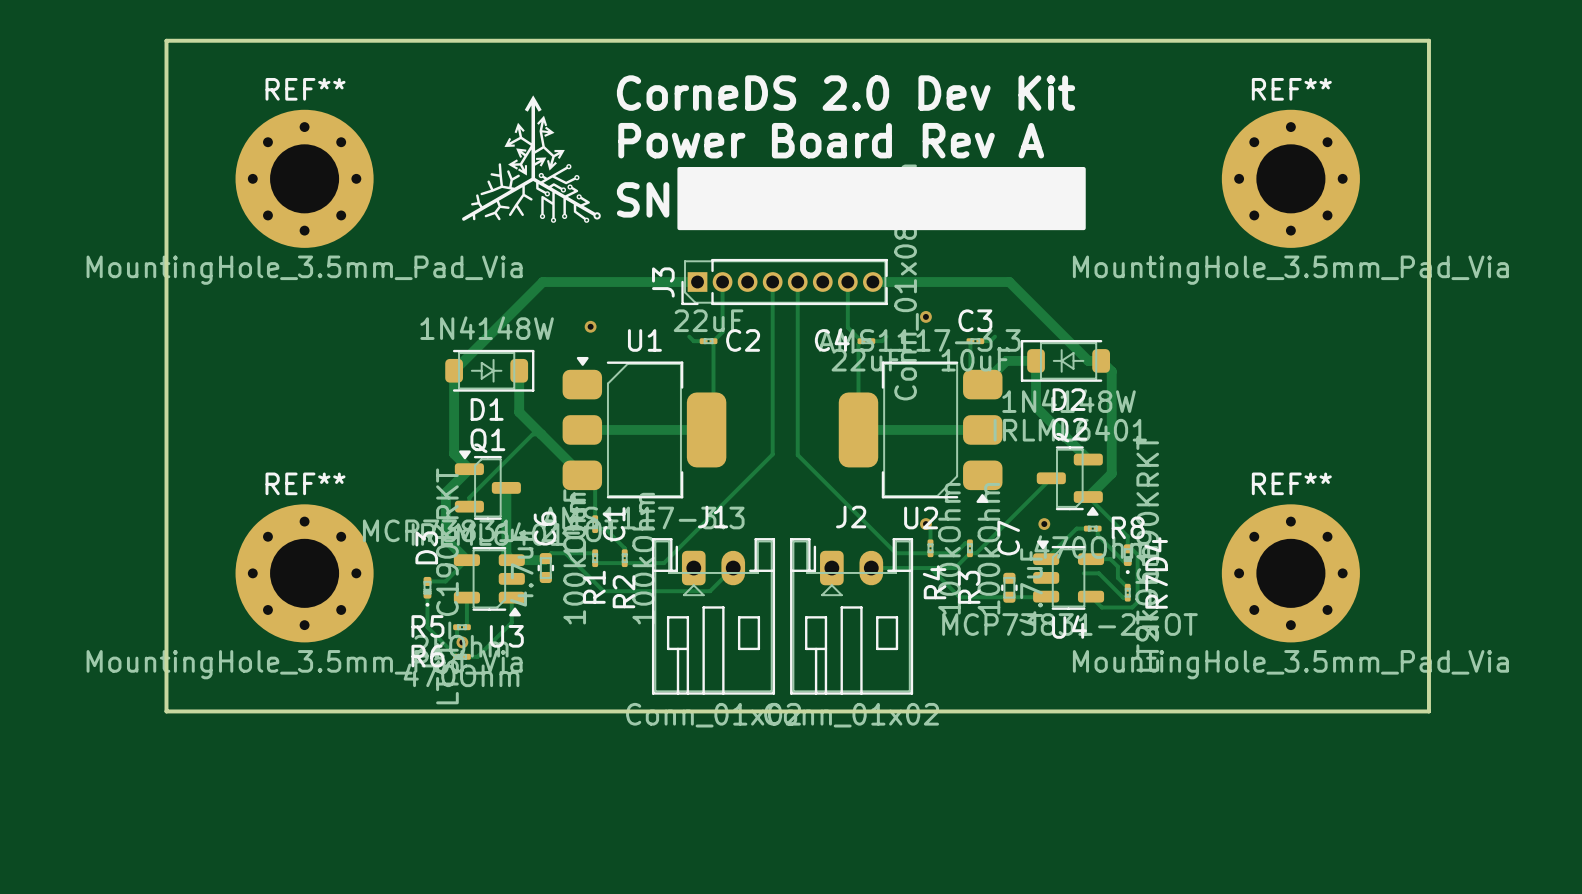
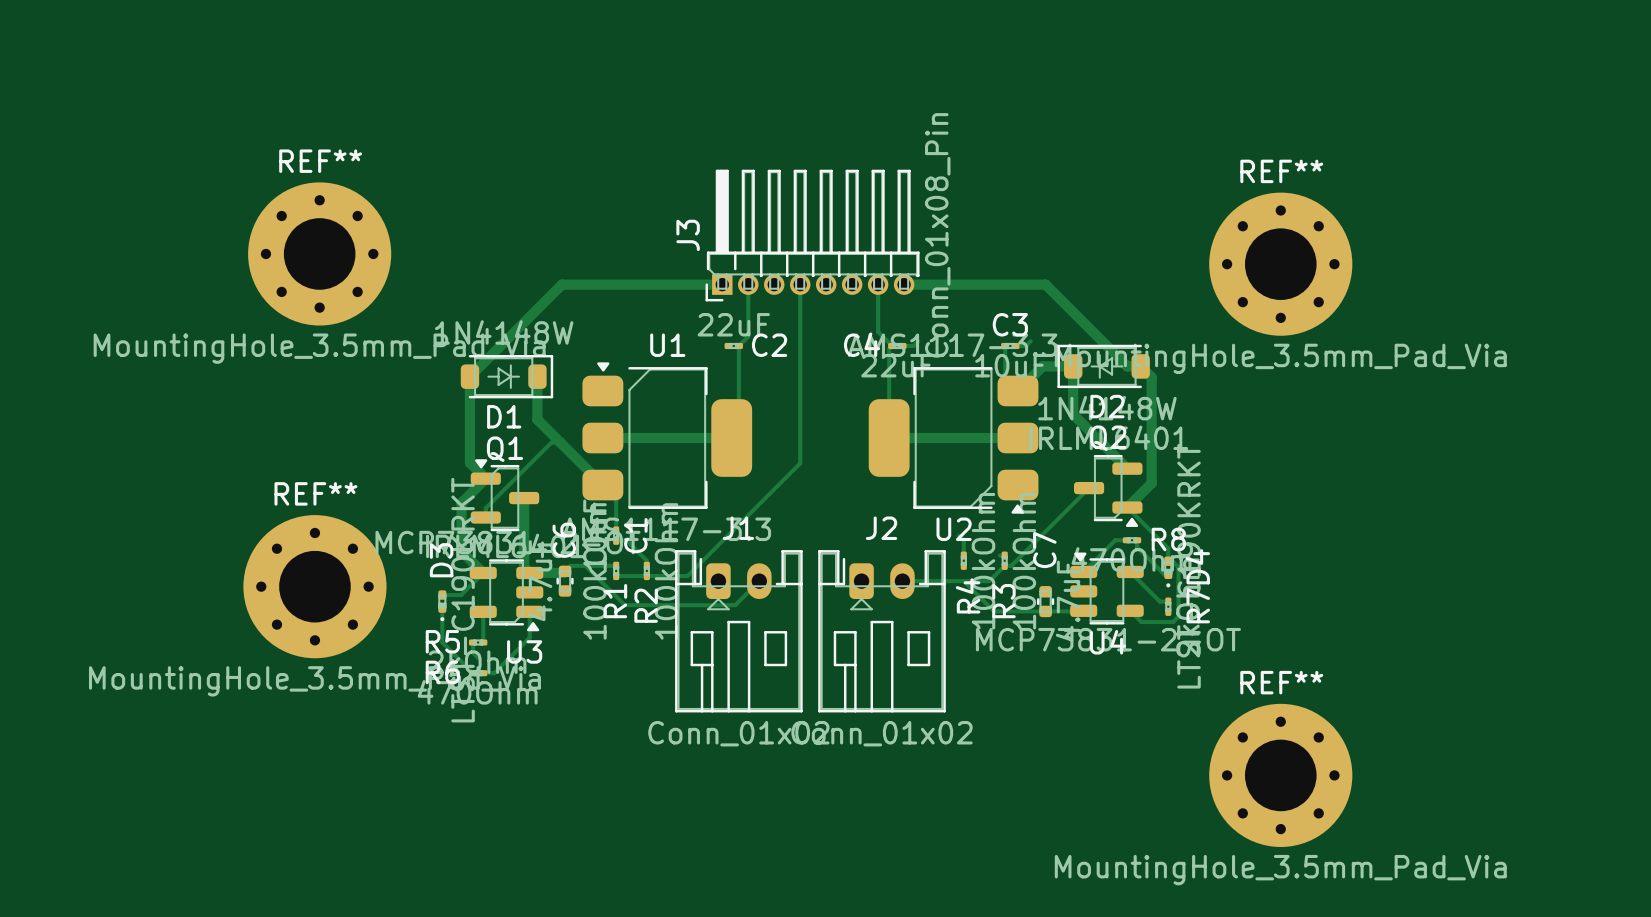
board edge: (166, 40) (1428, 40) (1428, 711) (166, 711) (166, 40) -> none
text: CorneDS 2.0 Dev Kit (846, 93) -> none
drawing: [462, 95, 601, 223] -> none
text: Power Board Rev A (831, 140) -> none
drawing: [677, 167, 1086, 231] -> none
REF** position: (304, 178) -> (319, 253)
REF** position: (1290, 178) -> (1280, 264)
text: SN (643, 199) -> none
J3 footprint: [681, 258, 888, 306] -> [705, 169, 920, 302]
track: (797, 282) (797, 455) (895, 553) (955, 553) (965, 543) -> none
via: (925, 316) -> none
via: (590, 326) -> none
track: (689, 336) (693, 341) (703, 341) -> none
via: (925, 524) -> none
via: (1044, 524) -> none
track: (1091, 559) (1110, 559) (1117, 566) (1117, 577) (1127, 587) -> (1130, 571) (1159, 601) (1168, 601)
track: (1083, 573) (1098, 573) (1123, 597) (1127, 597) -> none
REF**: MountingHole_3.5mm_Pad_Via (1290, 573) -> none
via: (462, 642) -> none
REF**: none -> MountingHole_3.5mm_Pad_Via (1280, 775)

